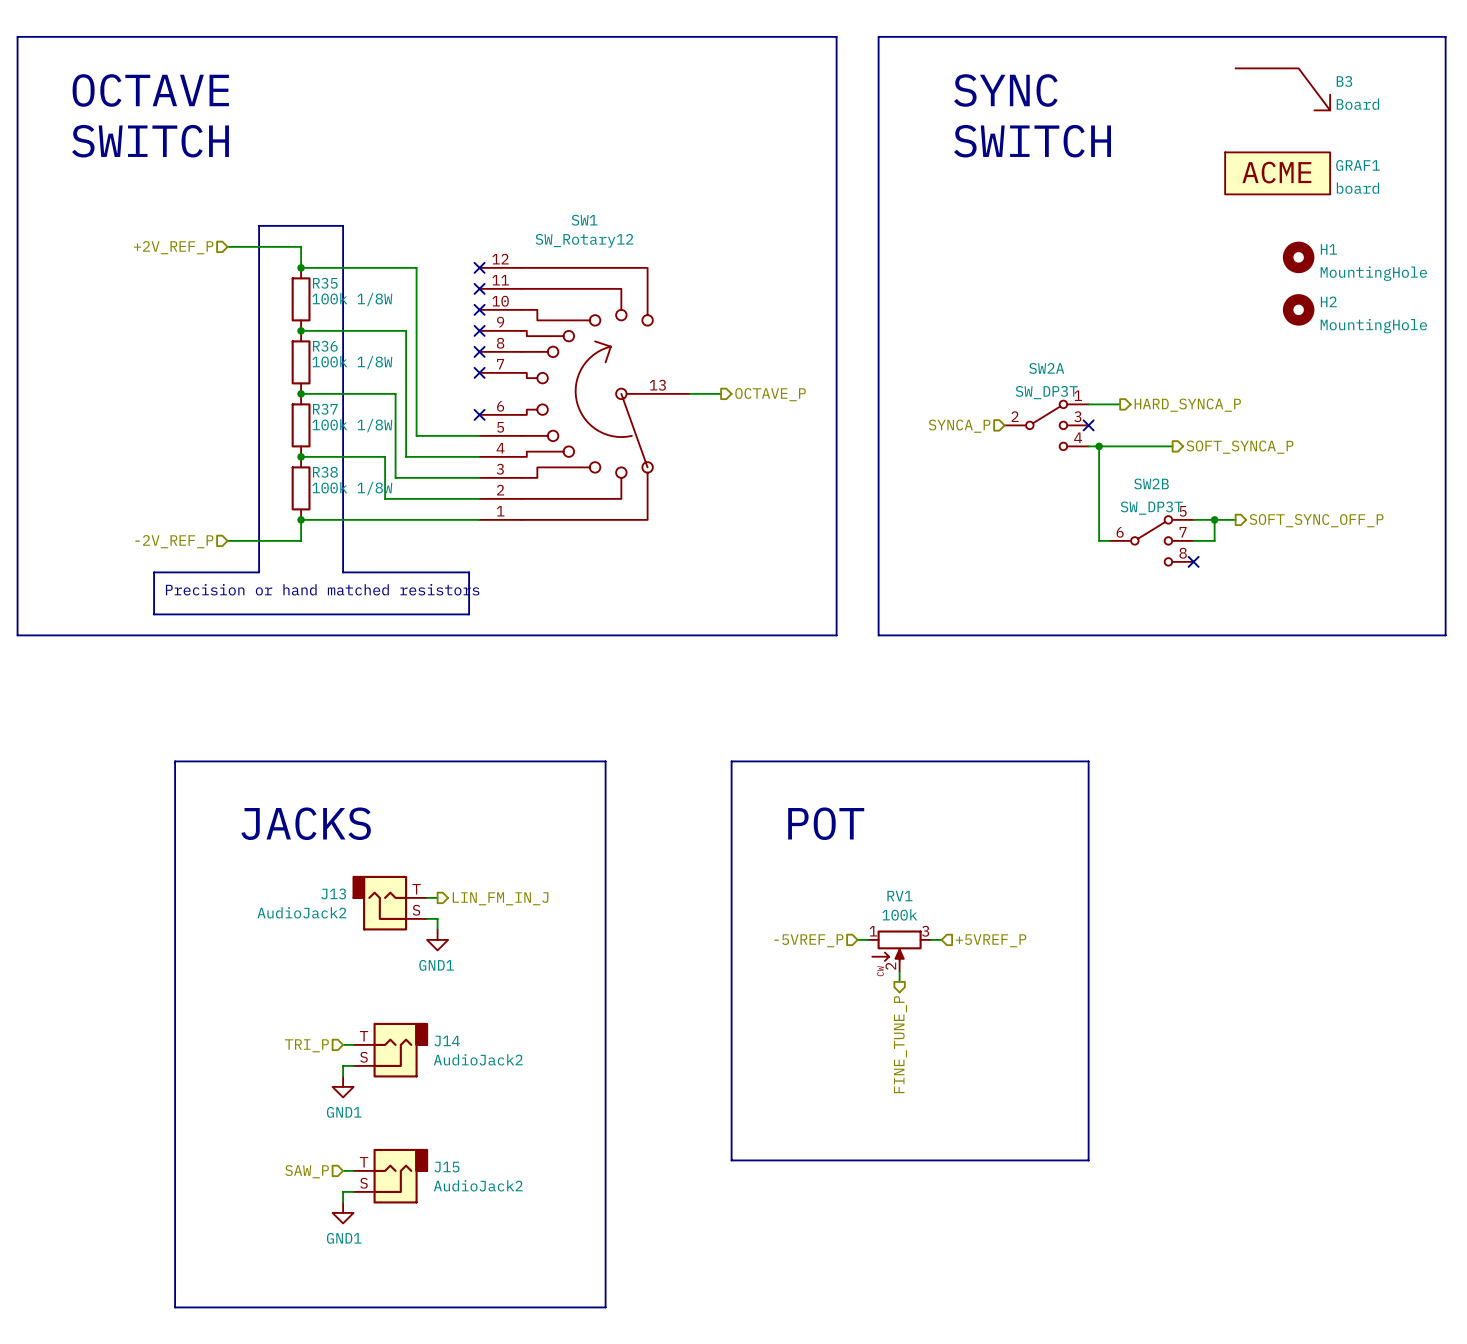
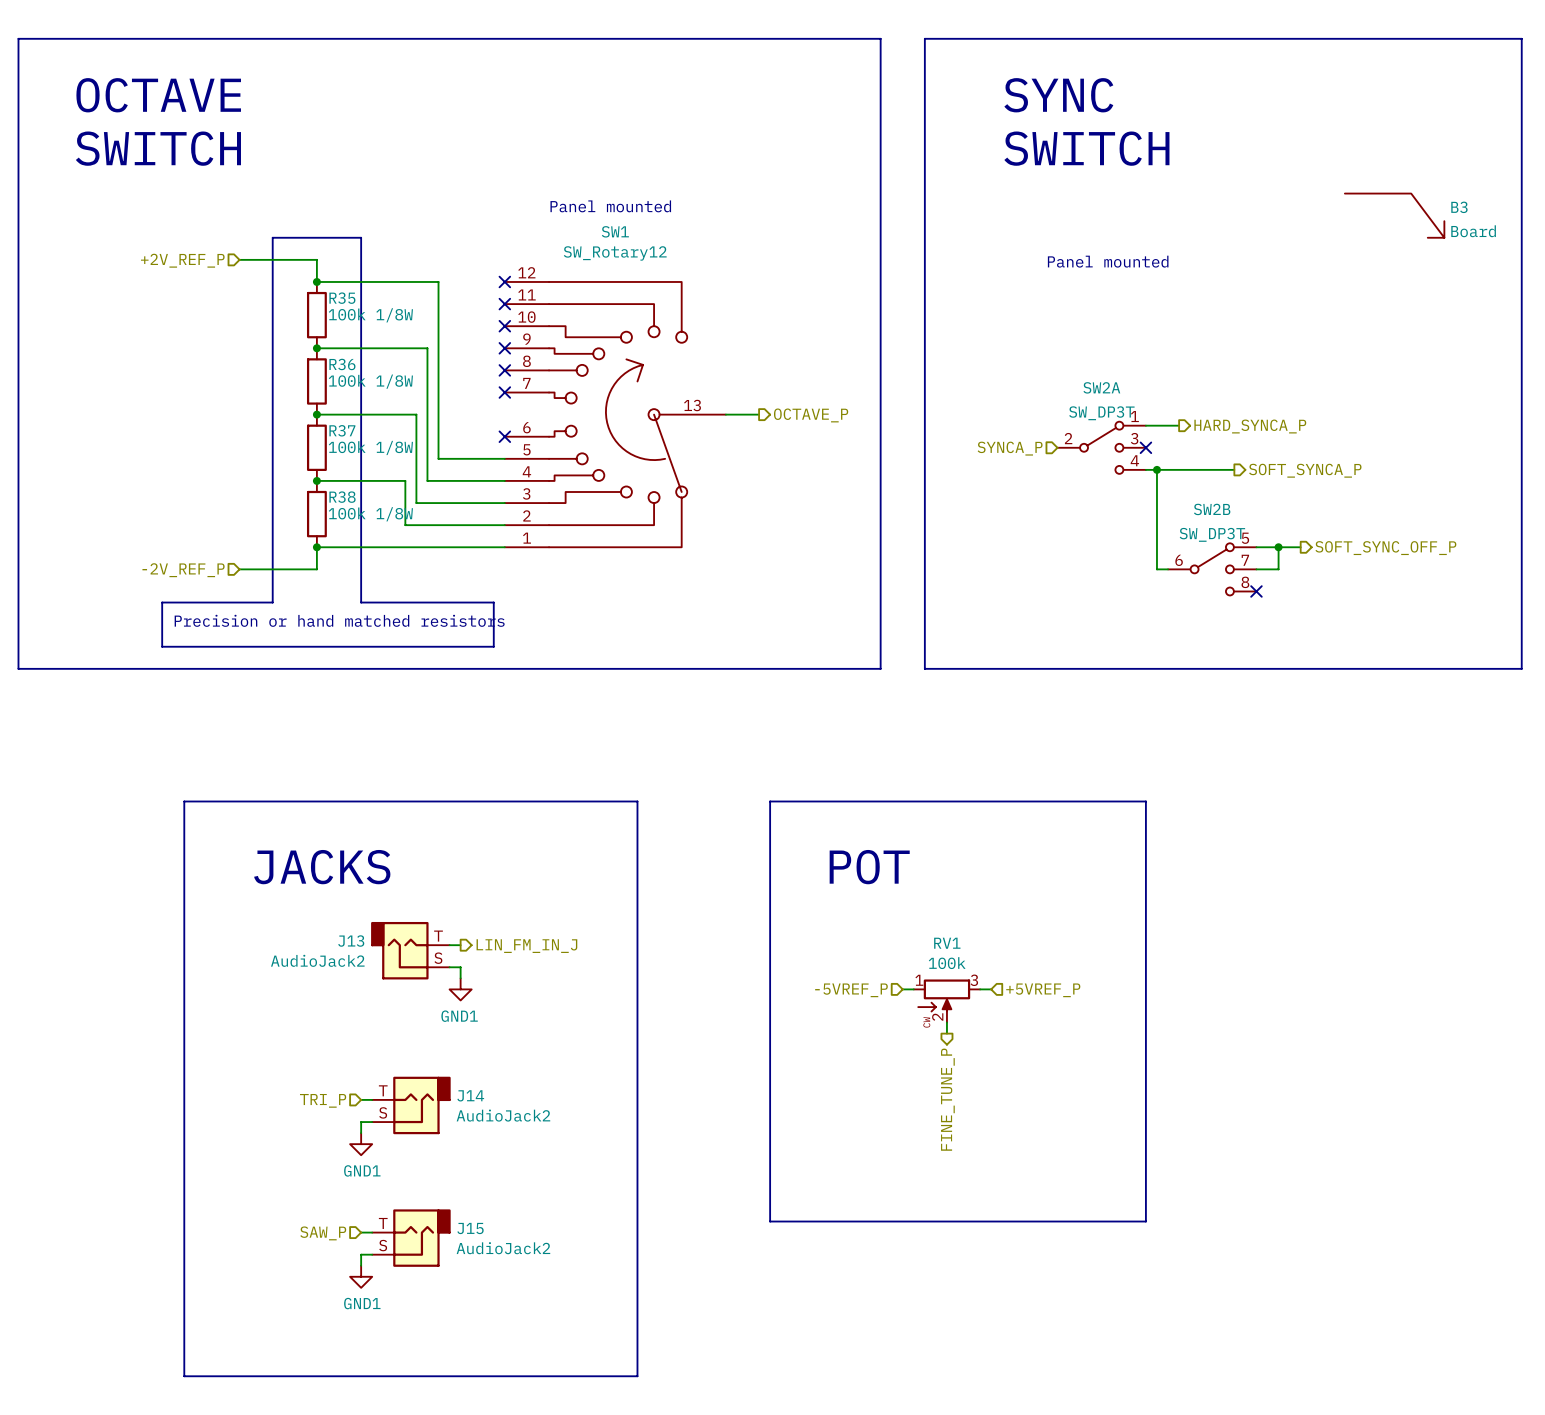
B3 position: (1282, 89) -> (1394, 215)
GRAF1: board (1277, 173) -> none
text: none -> Panel mounted (610, 206)
text: none -> Panel mounted (1108, 261)
H1: MountingHole (1298, 257) -> none
H2: MountingHole (1298, 309) -> none

